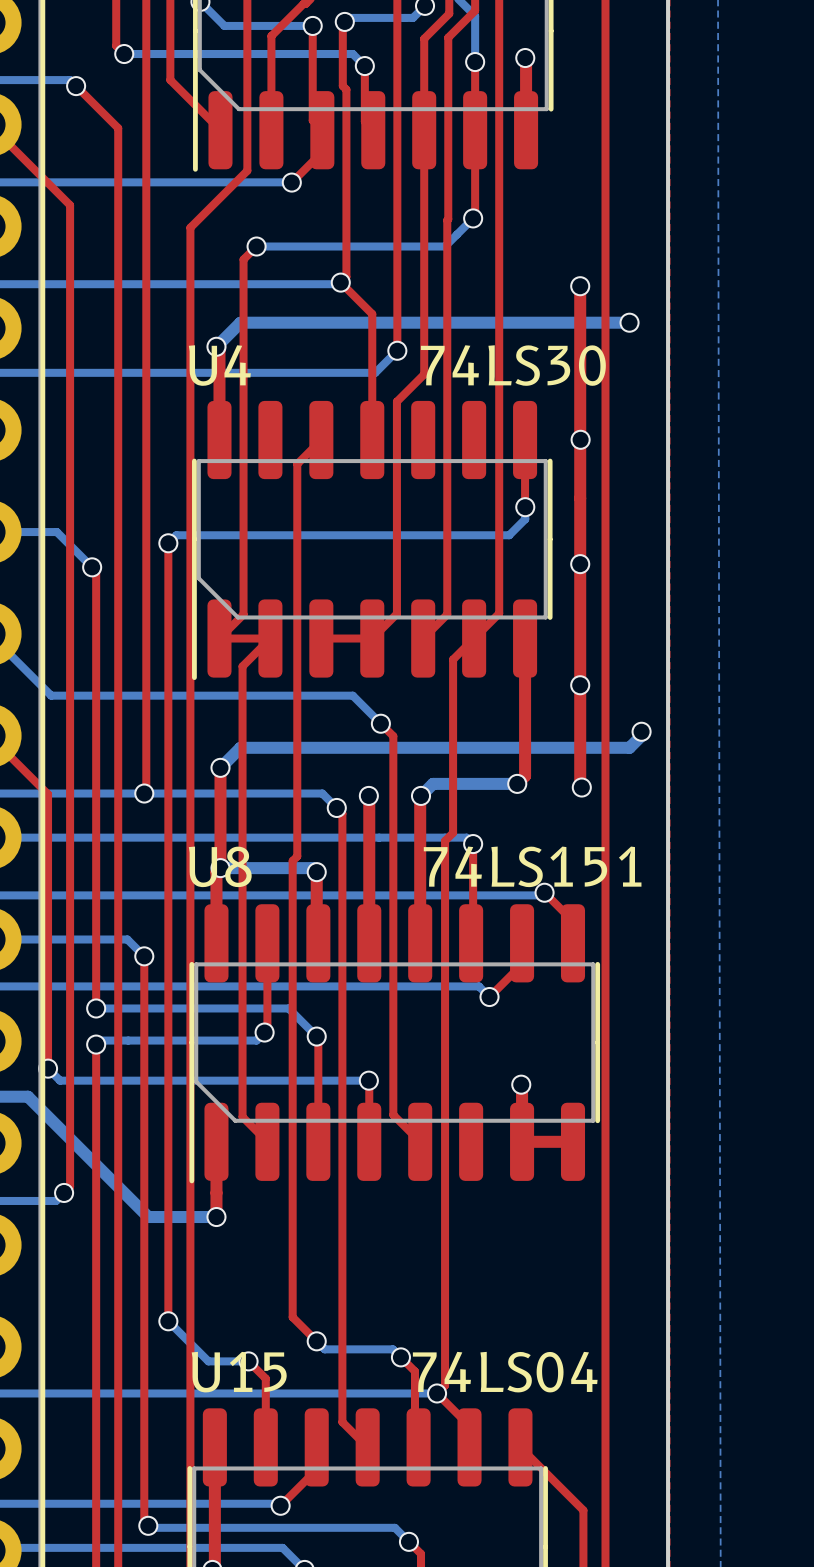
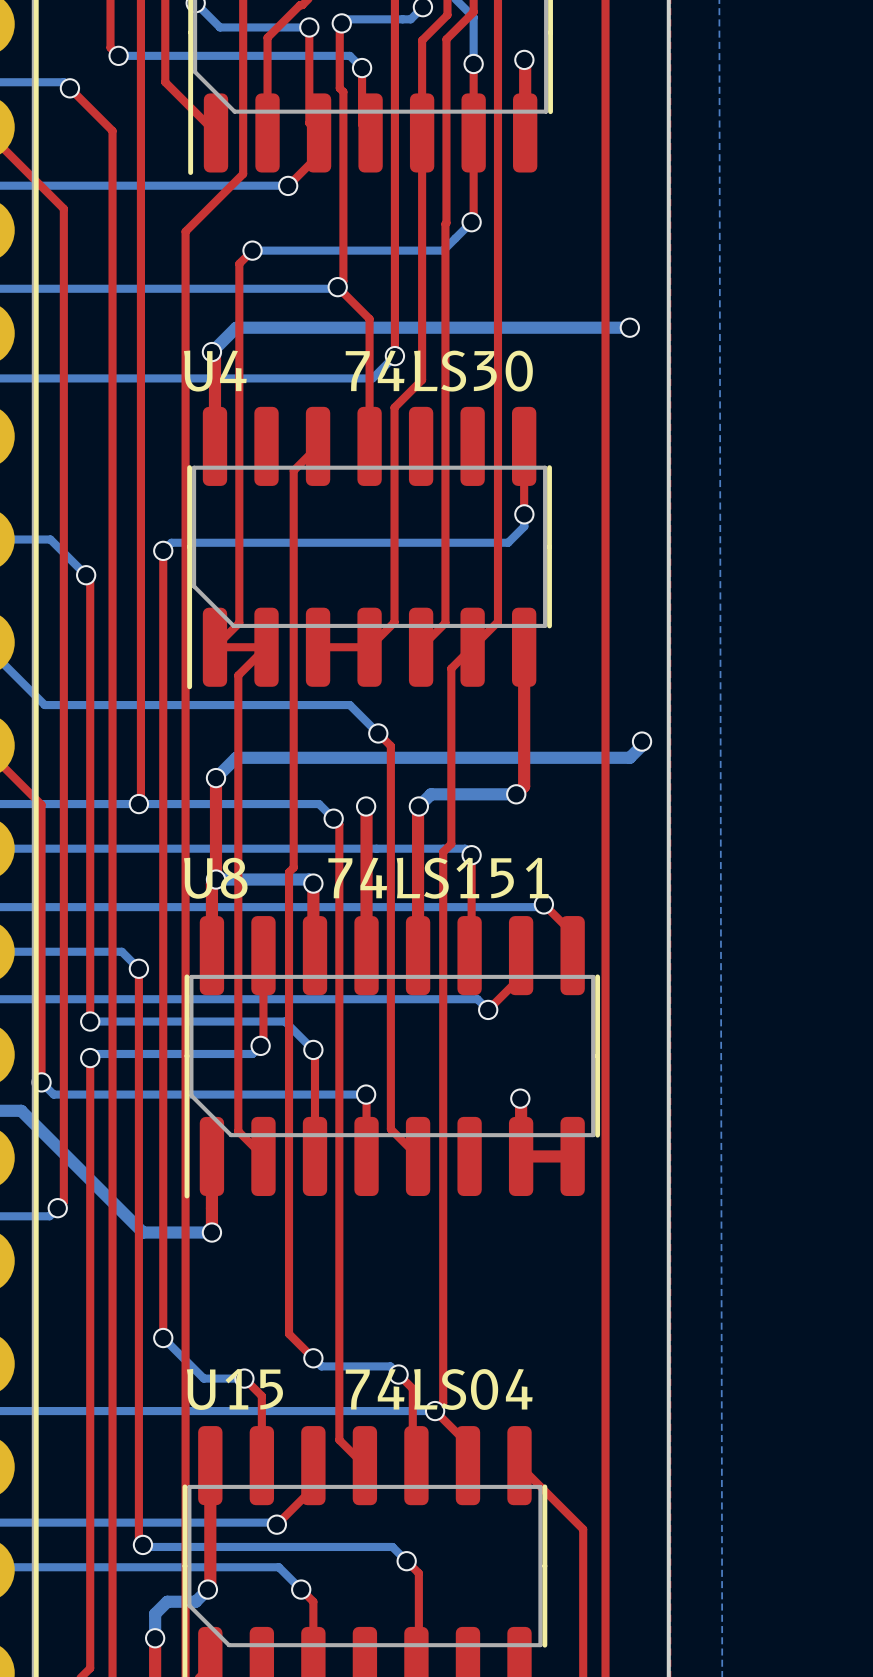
top track: (580, 286) (580, 785) (581, 787) -> none
via: (580, 286) -> none
U4 value position: 74LS30 (513, 365) -> 74LS30 (439, 371)
via: (580, 439) -> none
via: (580, 564) -> none
via: (580, 685) -> none
via: (581, 787) -> none
U8 value position: 74LS151 (532, 866) -> 74LS151 (438, 878)
U15 value position: 74LS04 (505, 1372) -> 74LS04 (439, 1389)

